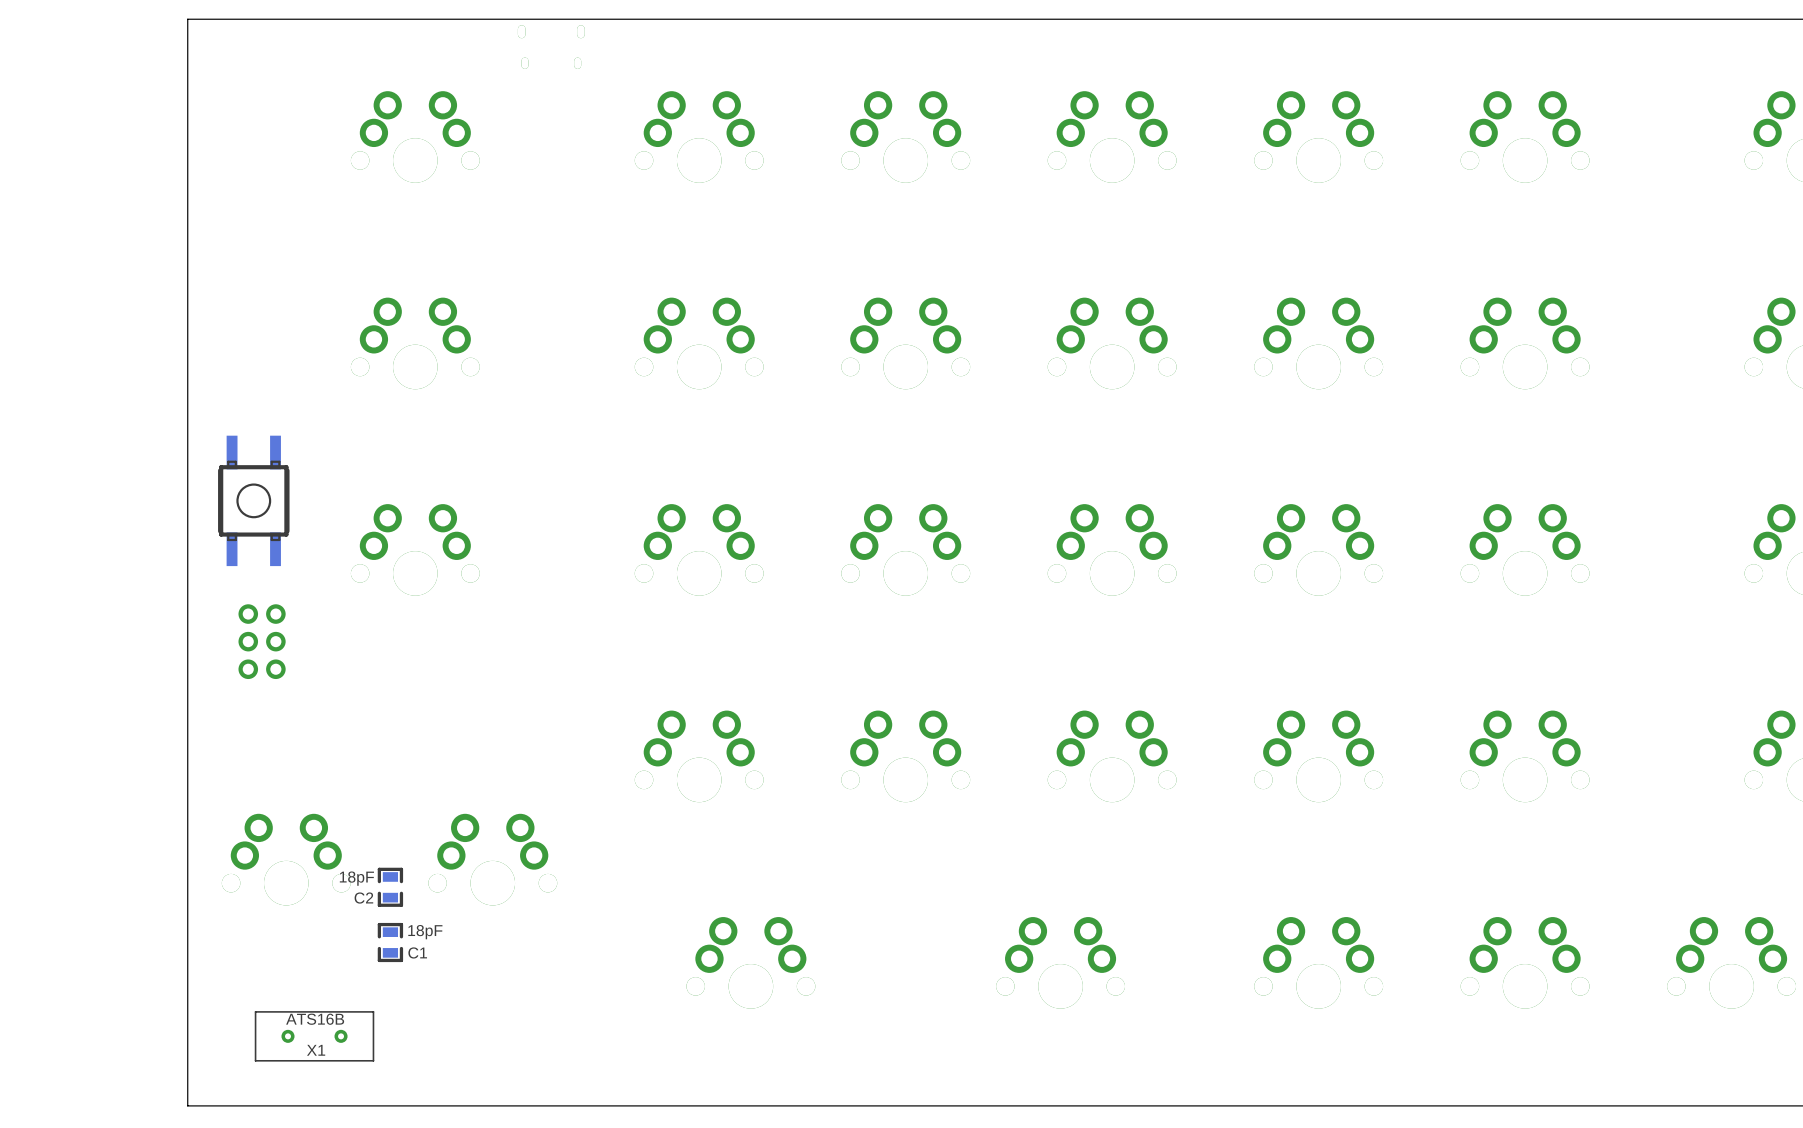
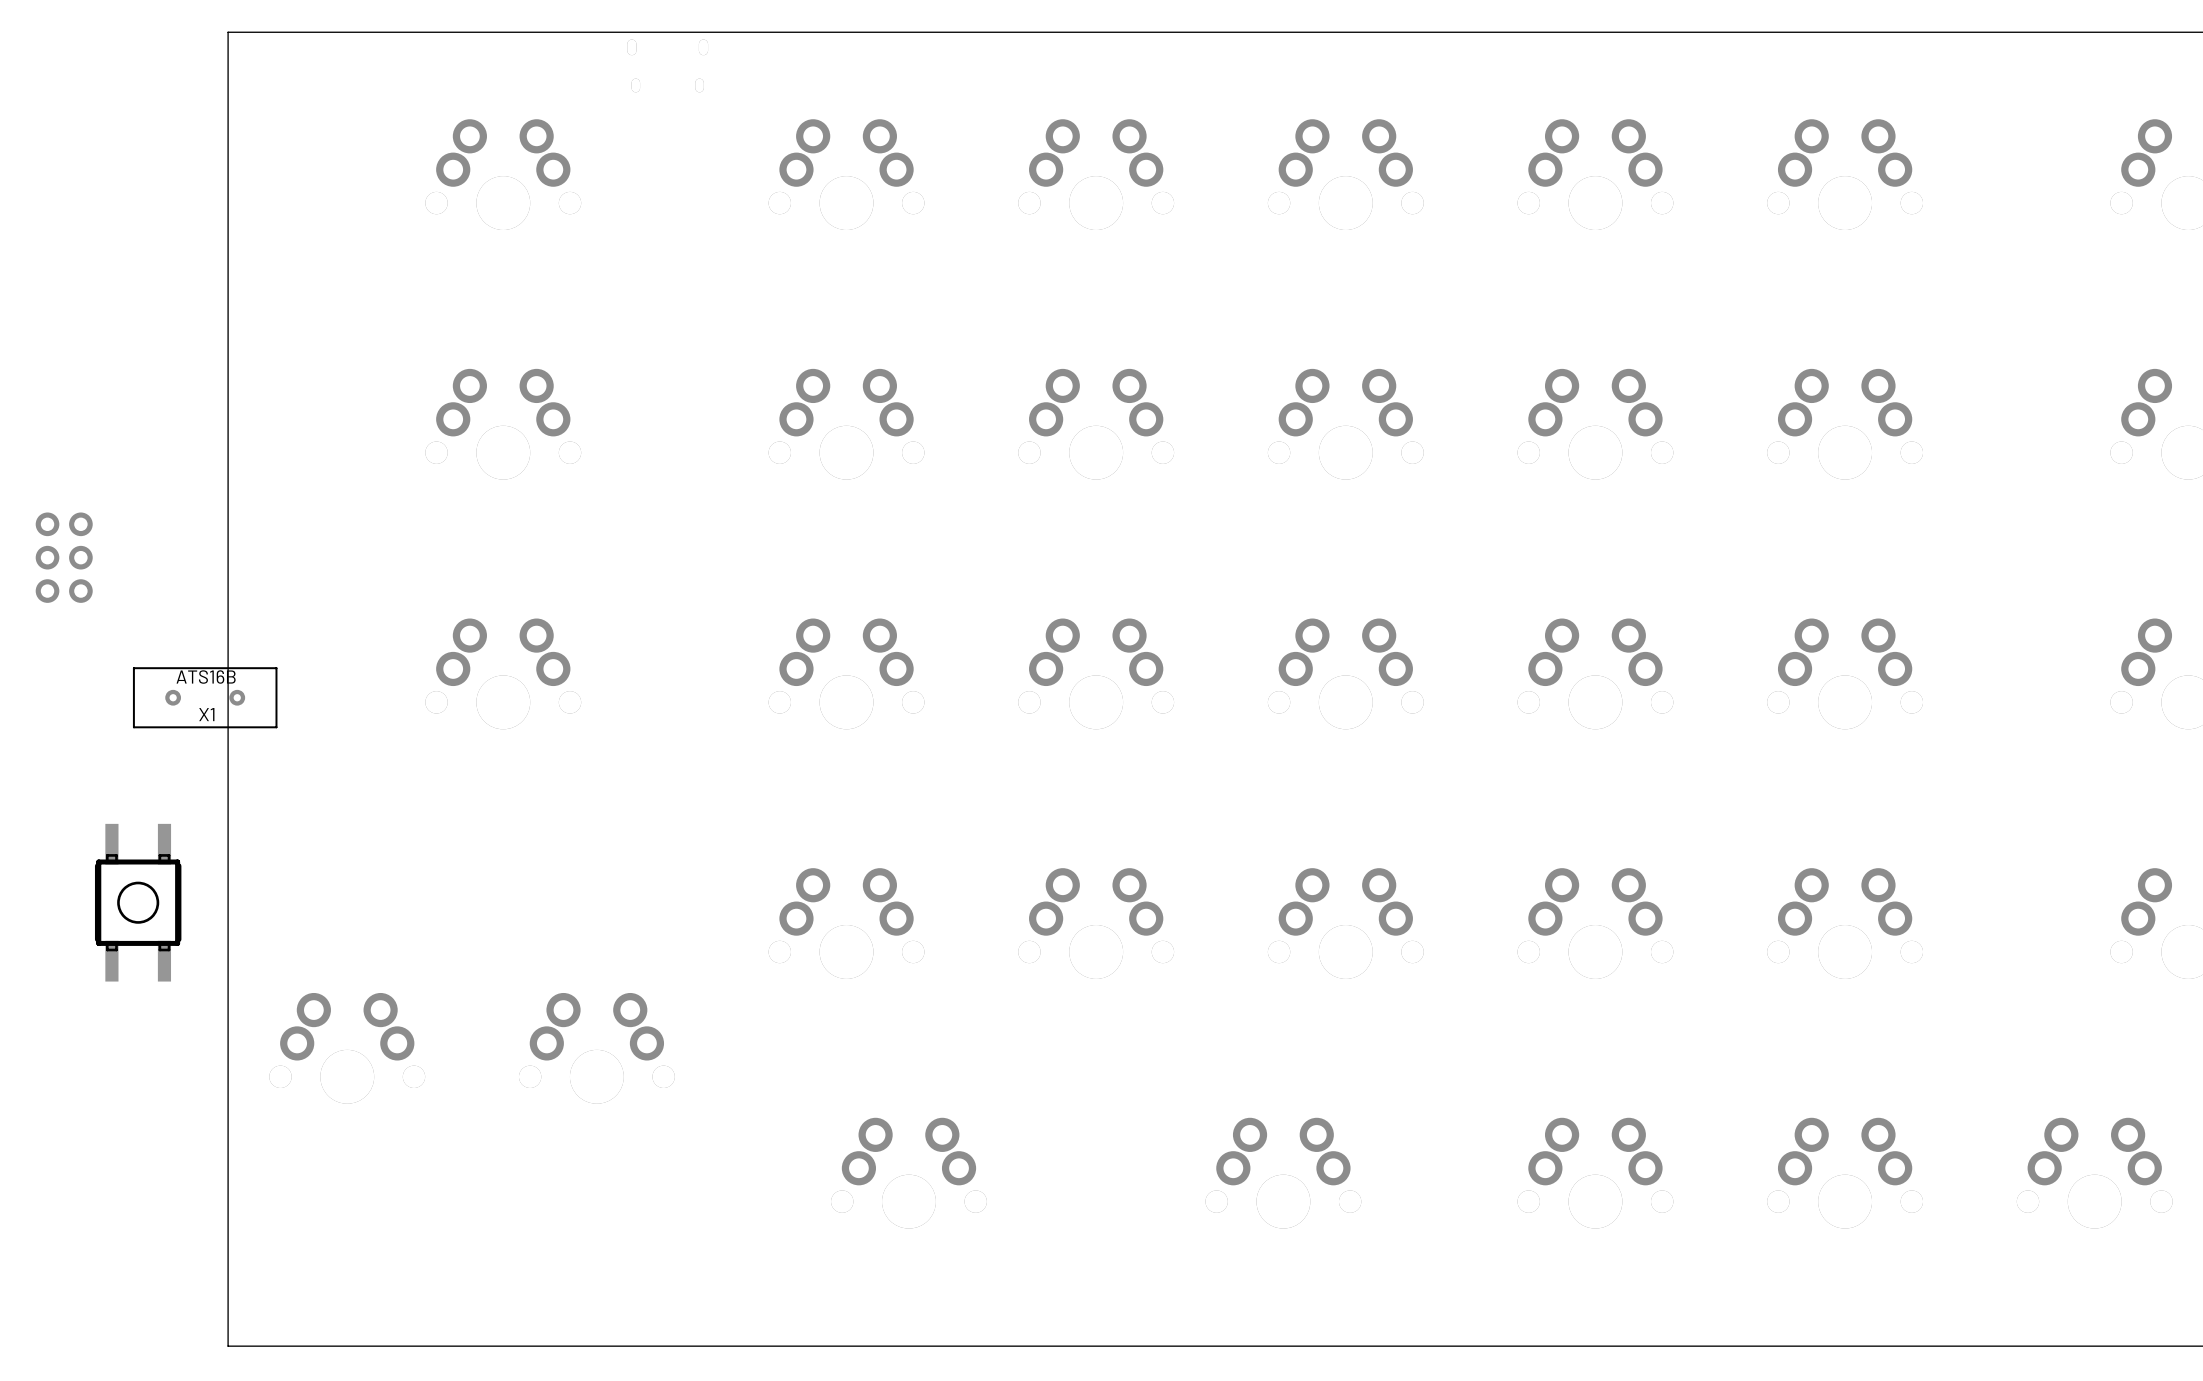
part: none -> (64, 557)
part: (253, 500) -> none
part: (262, 641) -> none
part: none -> (138, 902)
C2: 18pF (390, 887) -> none
C1: 18pF (390, 942) -> none
X1 position: (314, 1036) -> (205, 697)

